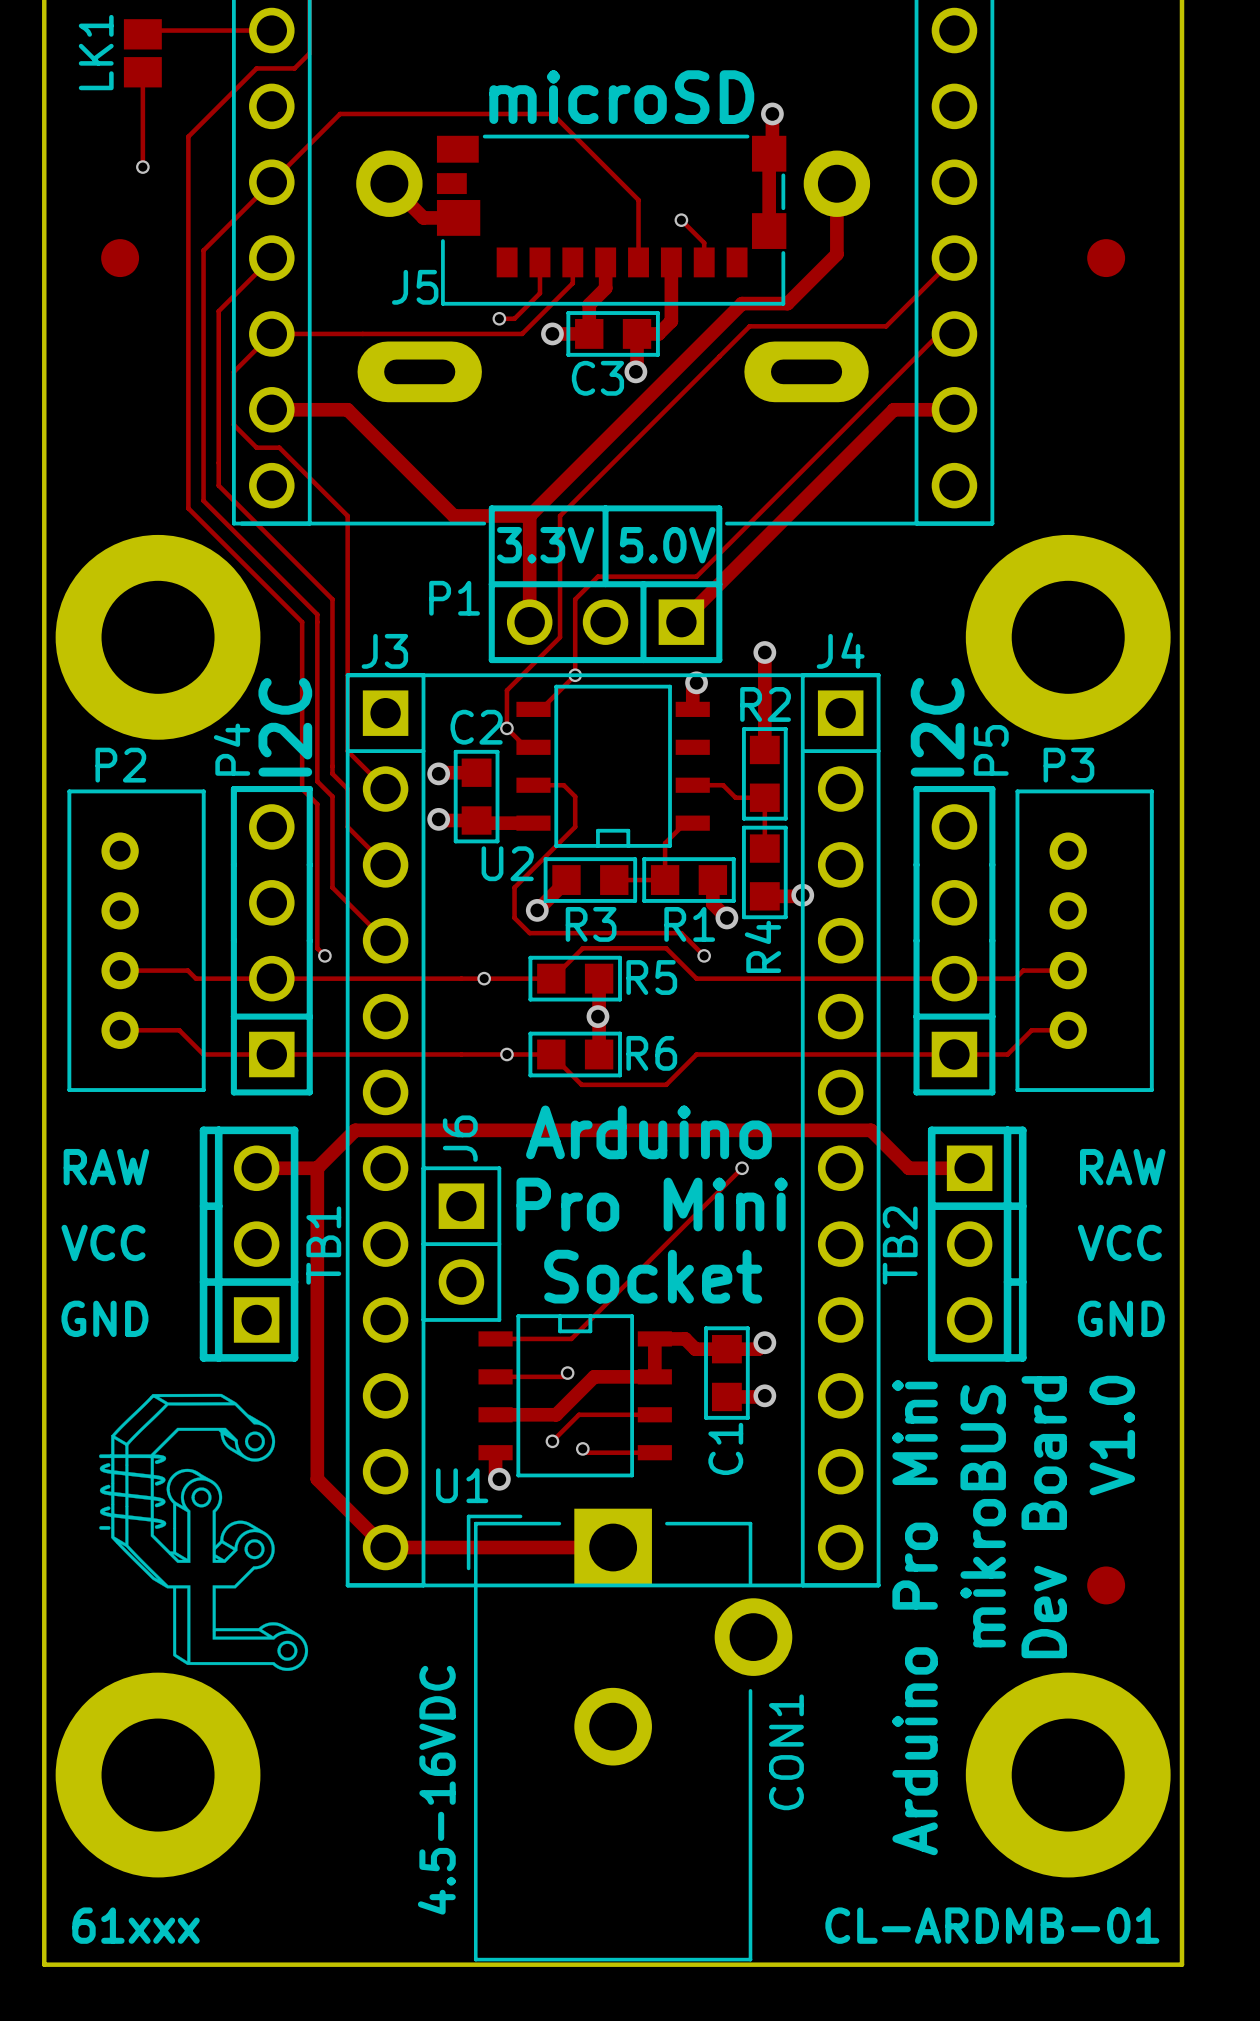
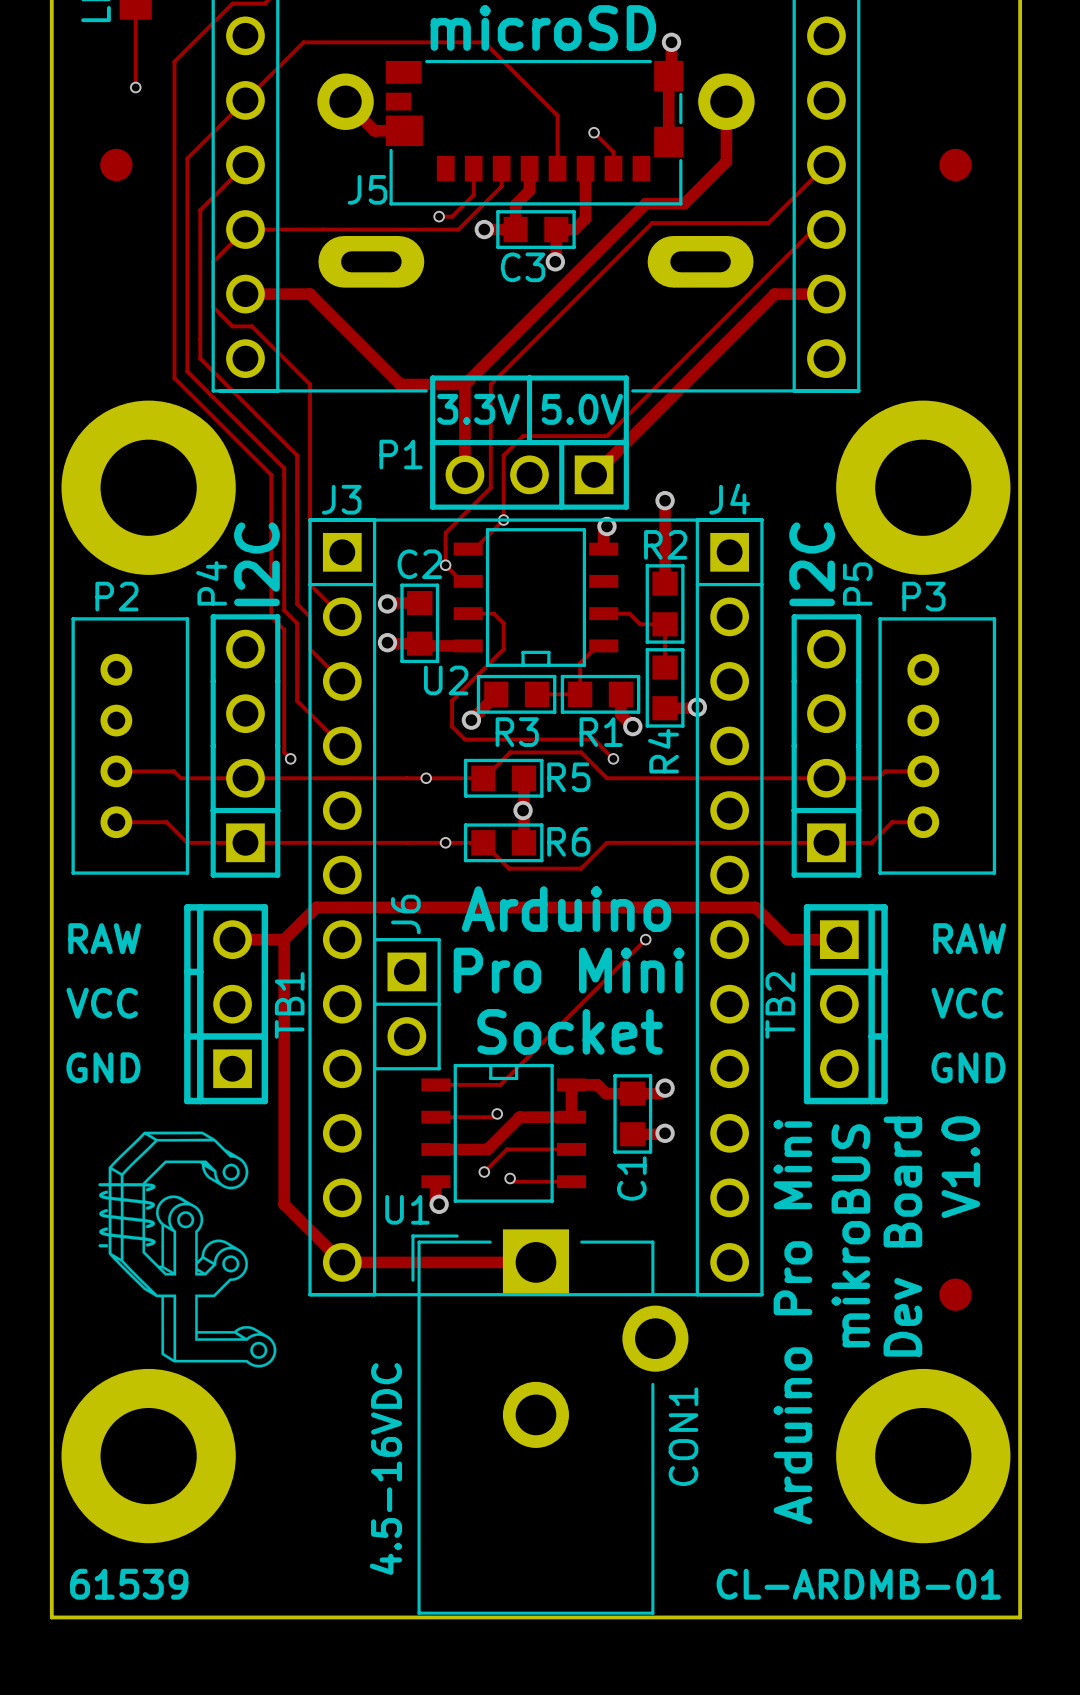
text: 61xxx (136, 1925) -> 61539 (129, 1584)

